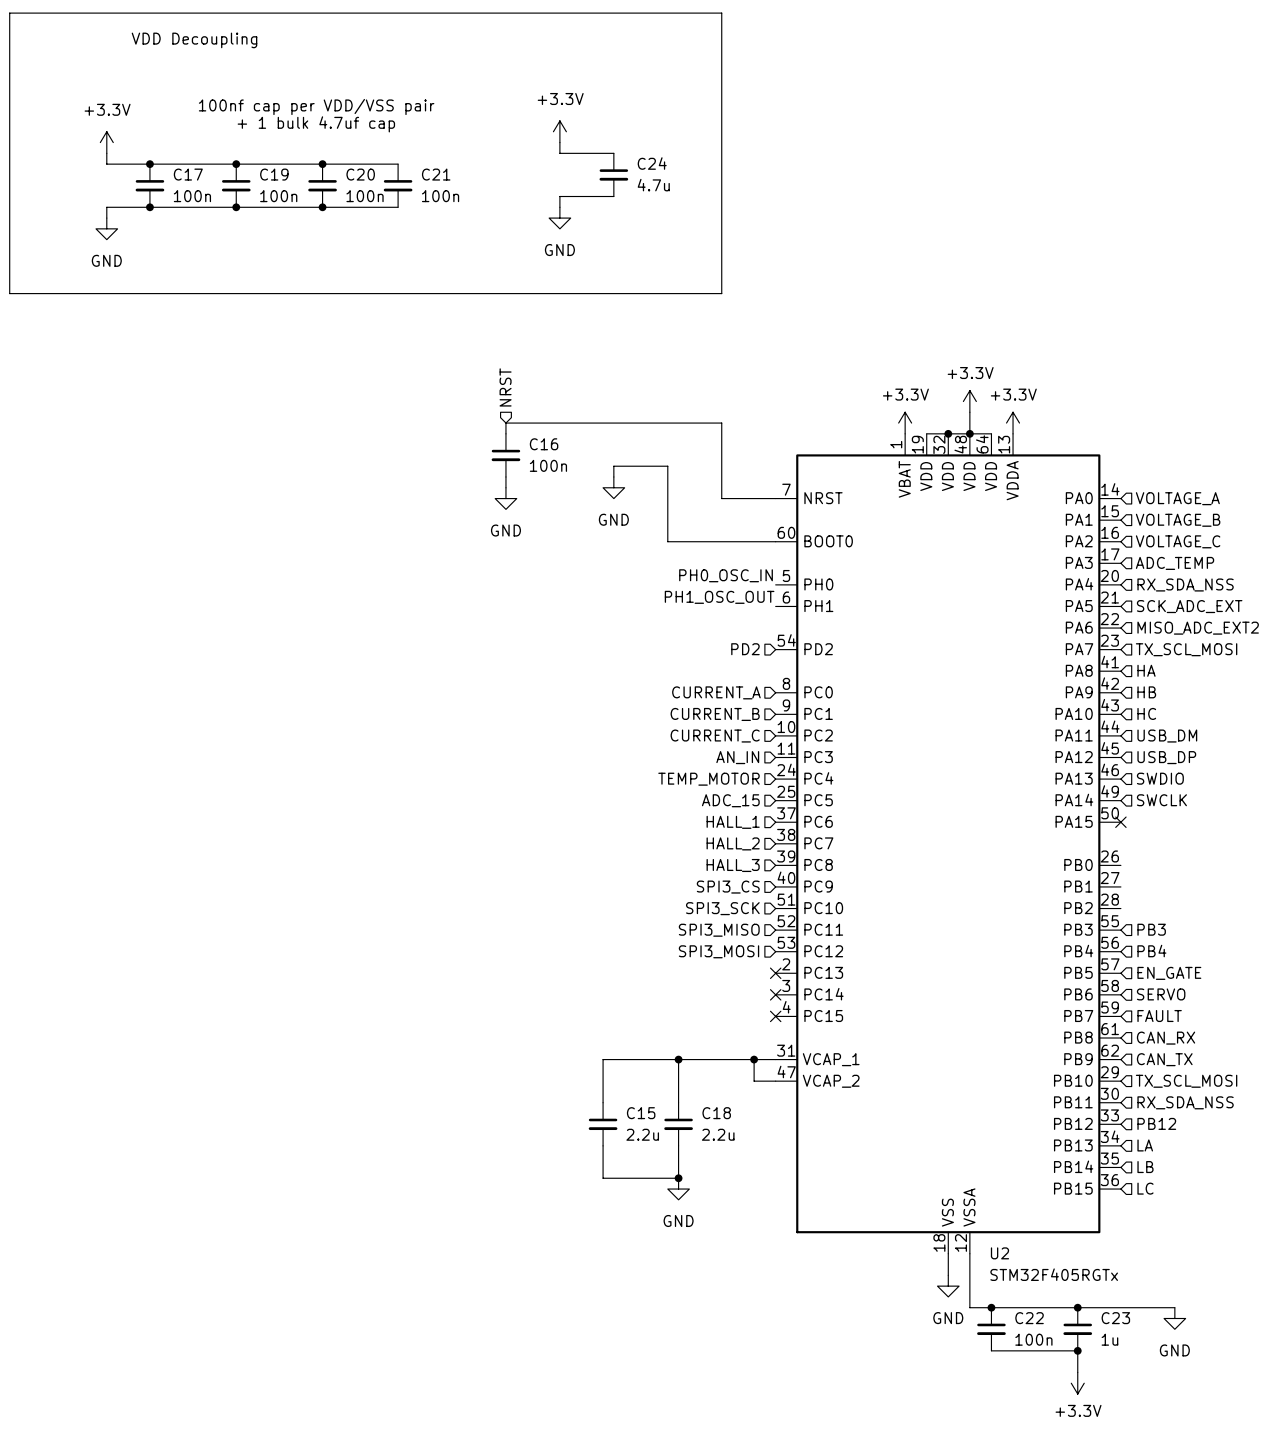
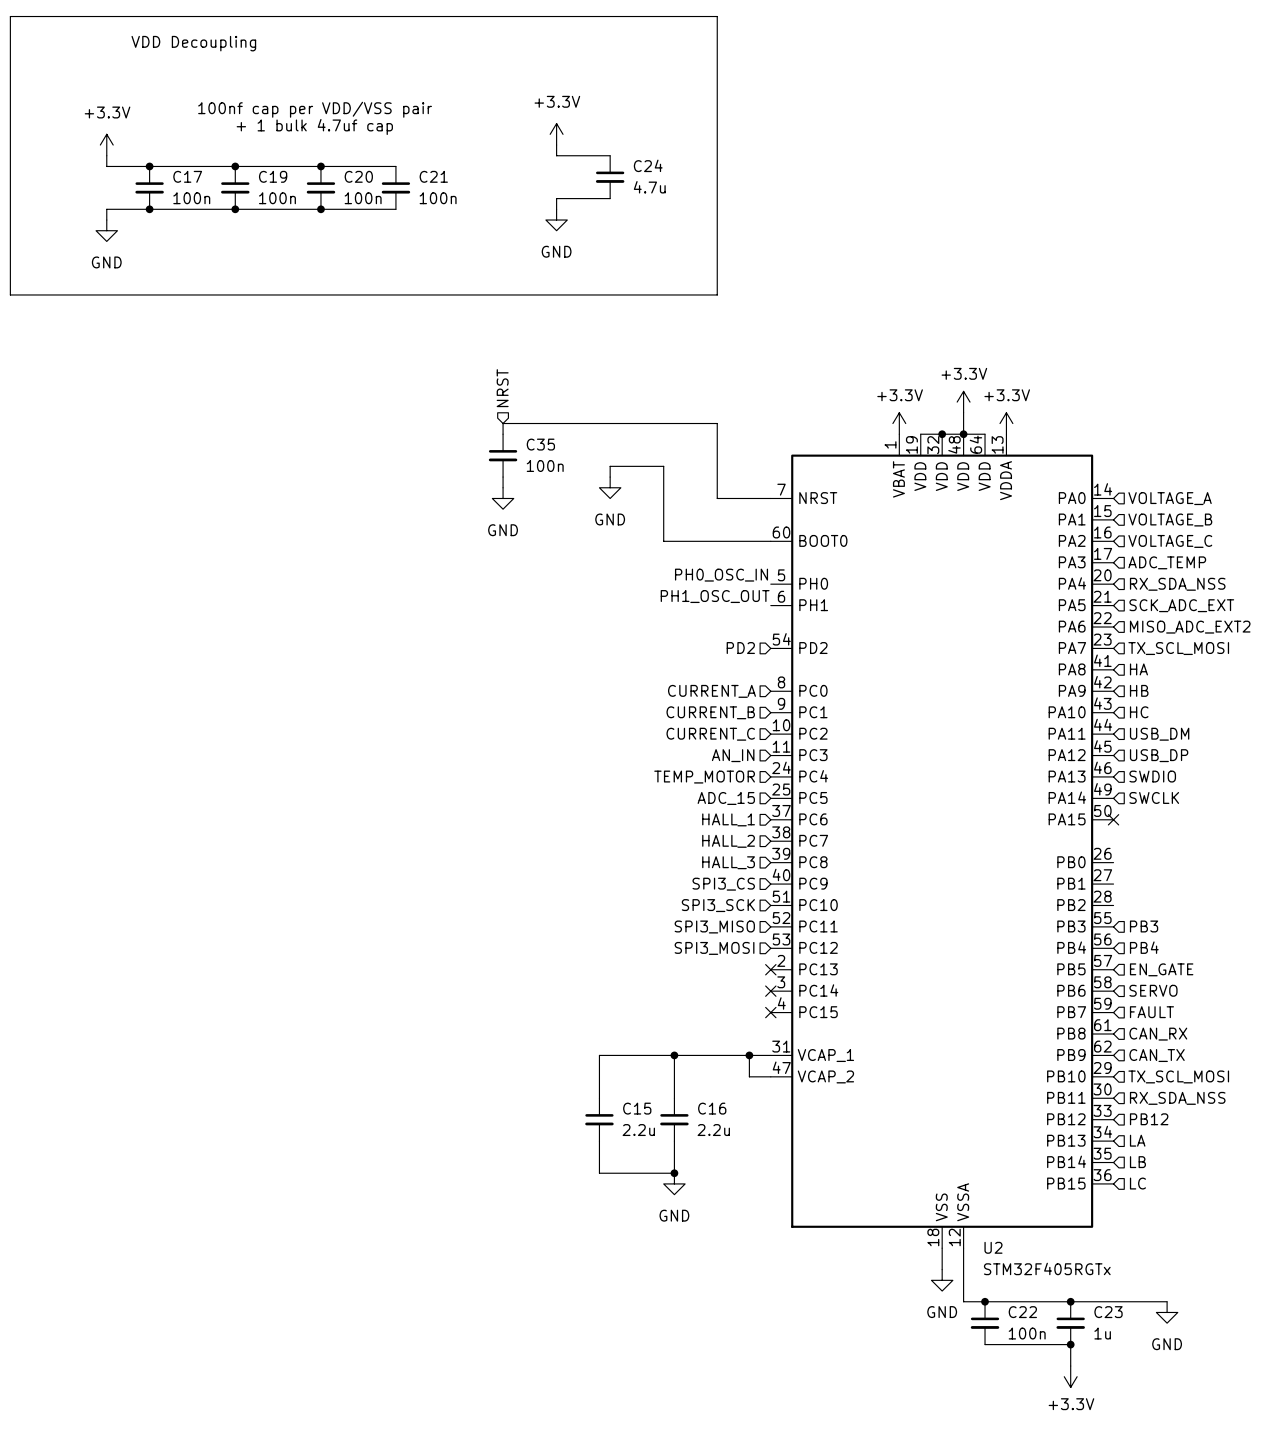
C16 name: C16 (544, 444) -> C35 (540, 444)
C18 name: C18 (716, 1113) -> C16 (712, 1108)

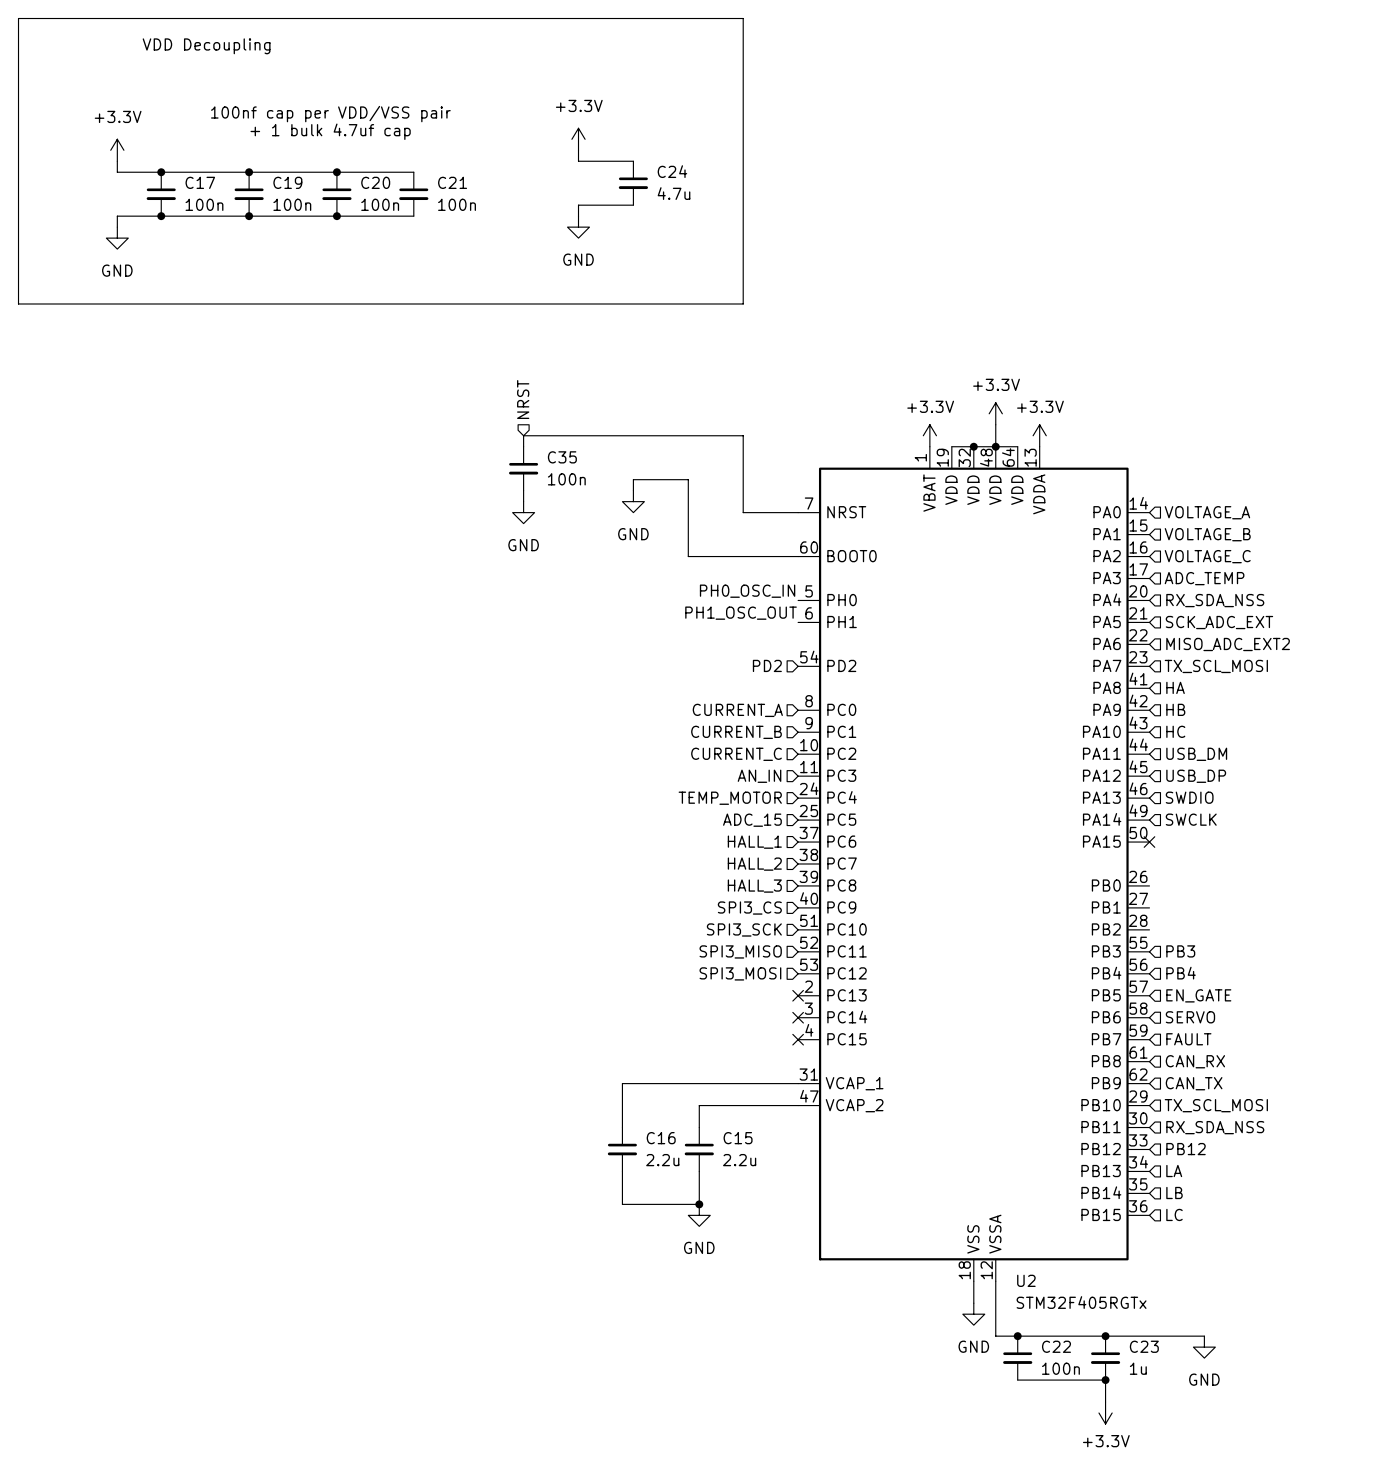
wire: (674, 1055) (674, 1076) -> (776, 1105) (699, 1105)
junction: (674, 1055) -> none
wire: (749, 1055) (749, 1076) -> none
junction: (749, 1055) -> none
C15 name: C15 (637, 1108) -> C16 (661, 1138)
C16 name: C16 (712, 1108) -> C15 (738, 1138)

